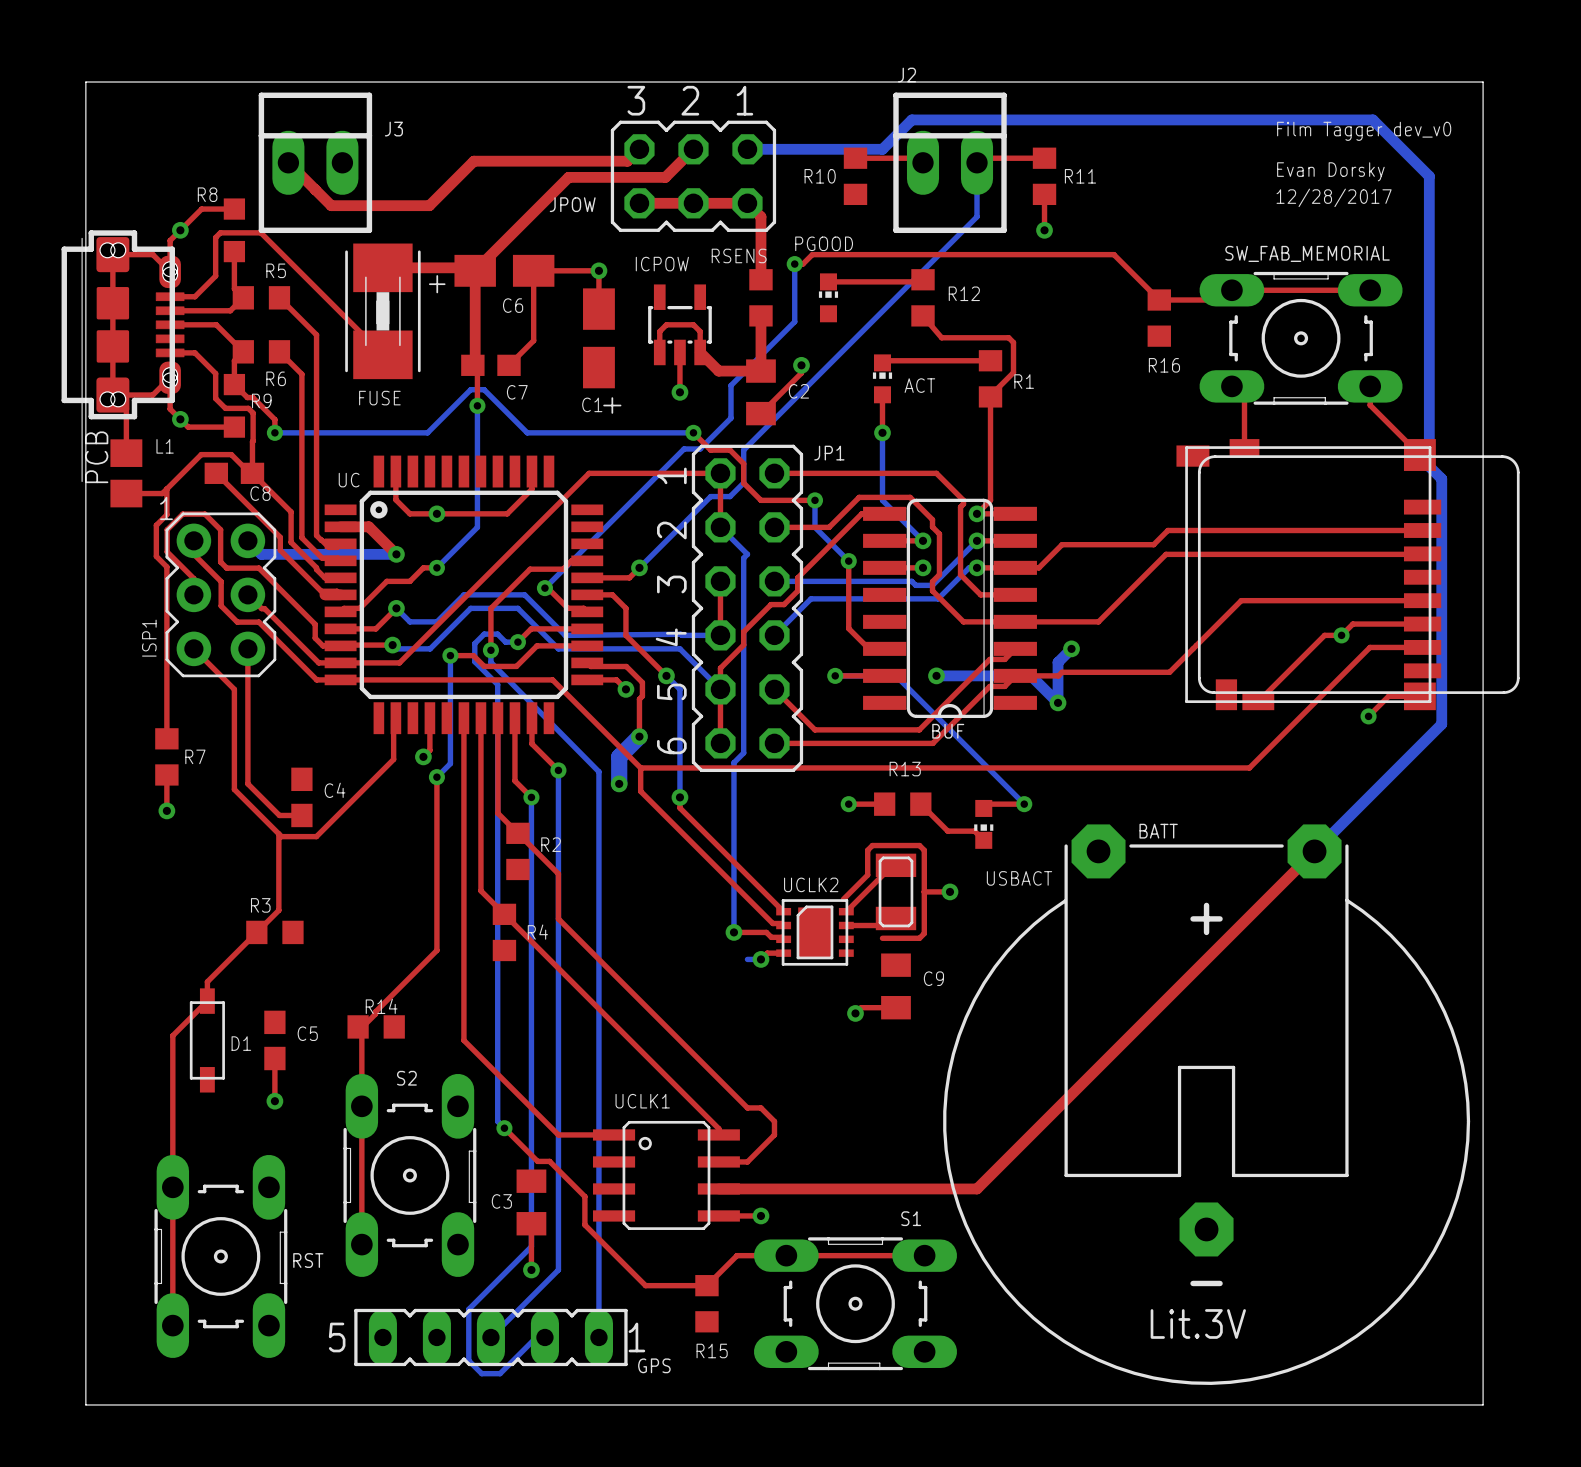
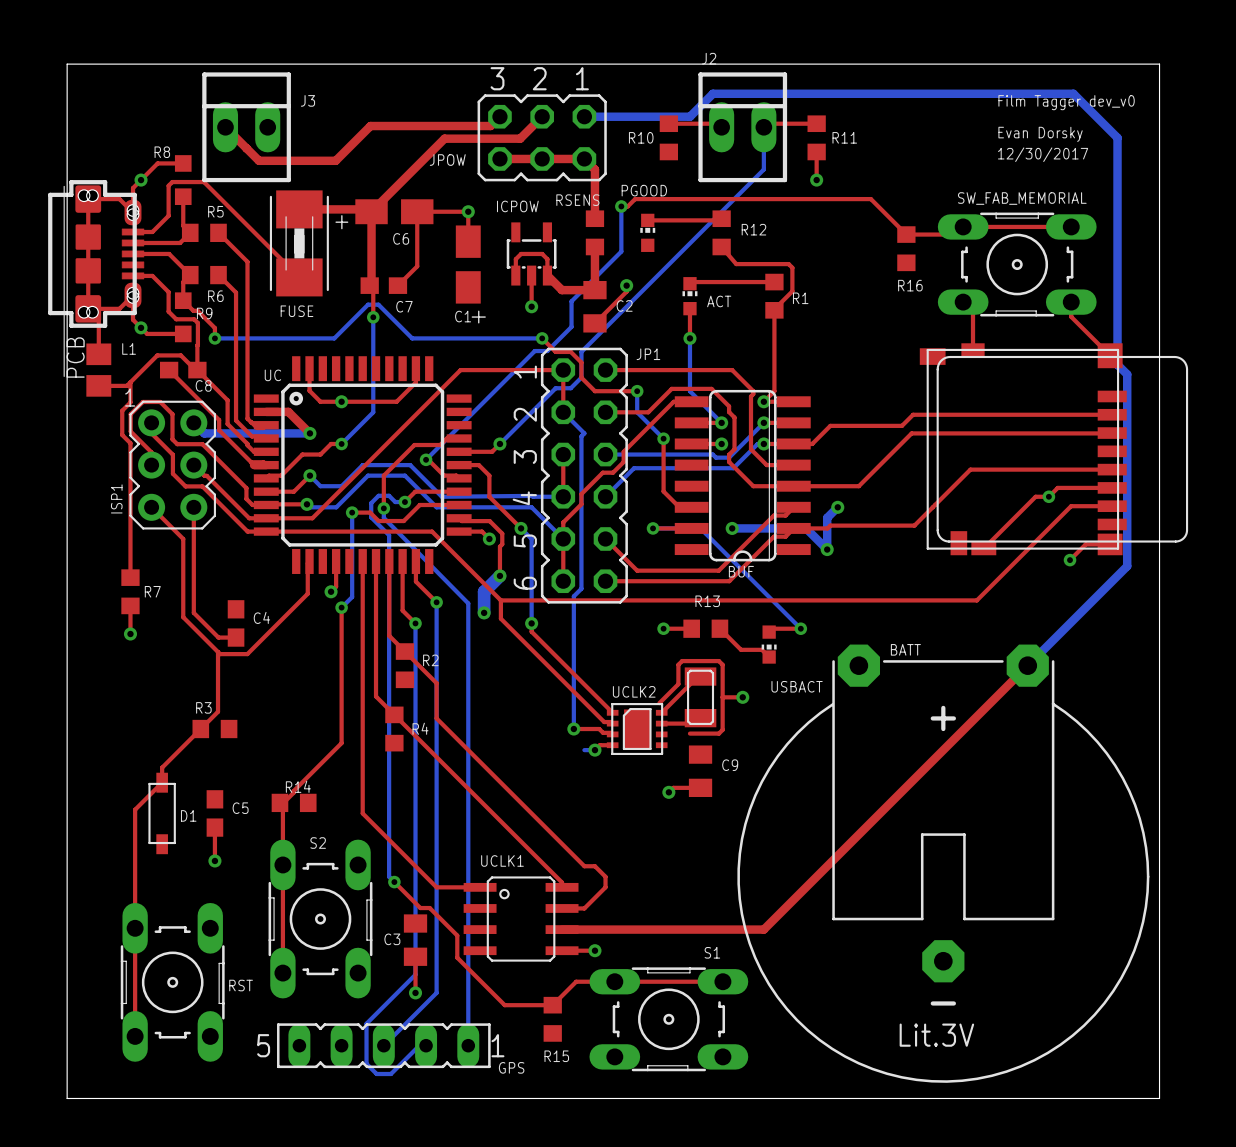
text: 12/28/2017 (1334, 197) -> 12/30/2017 (1043, 154)

